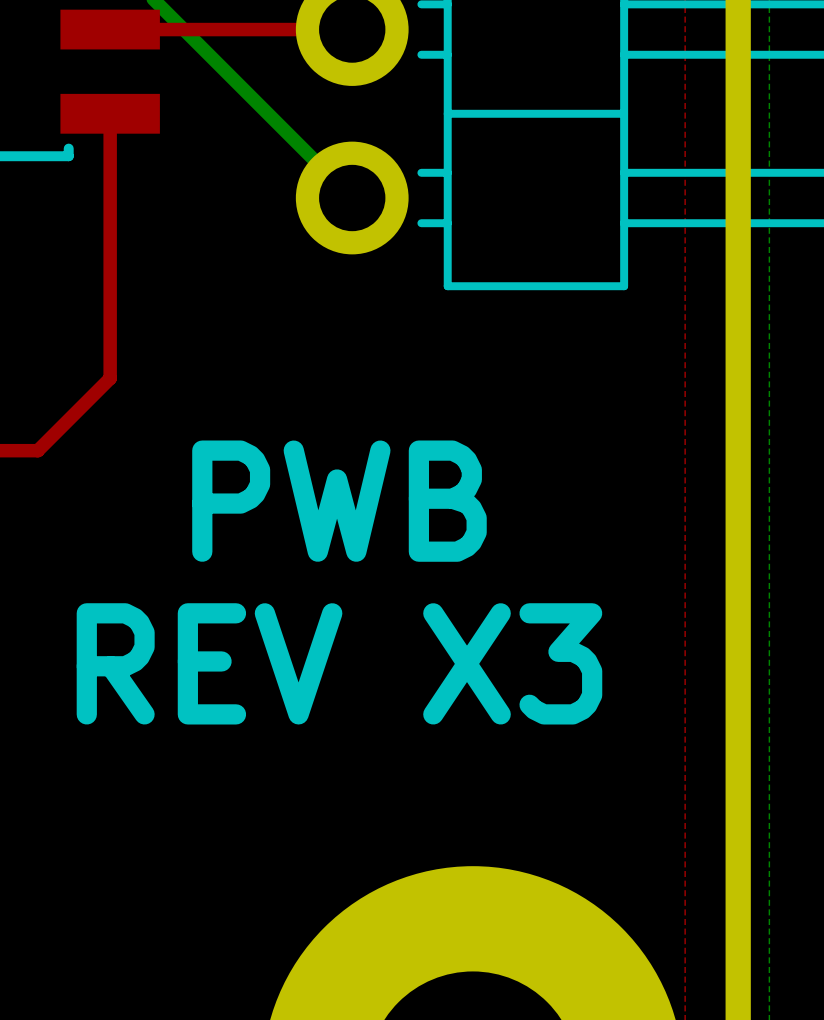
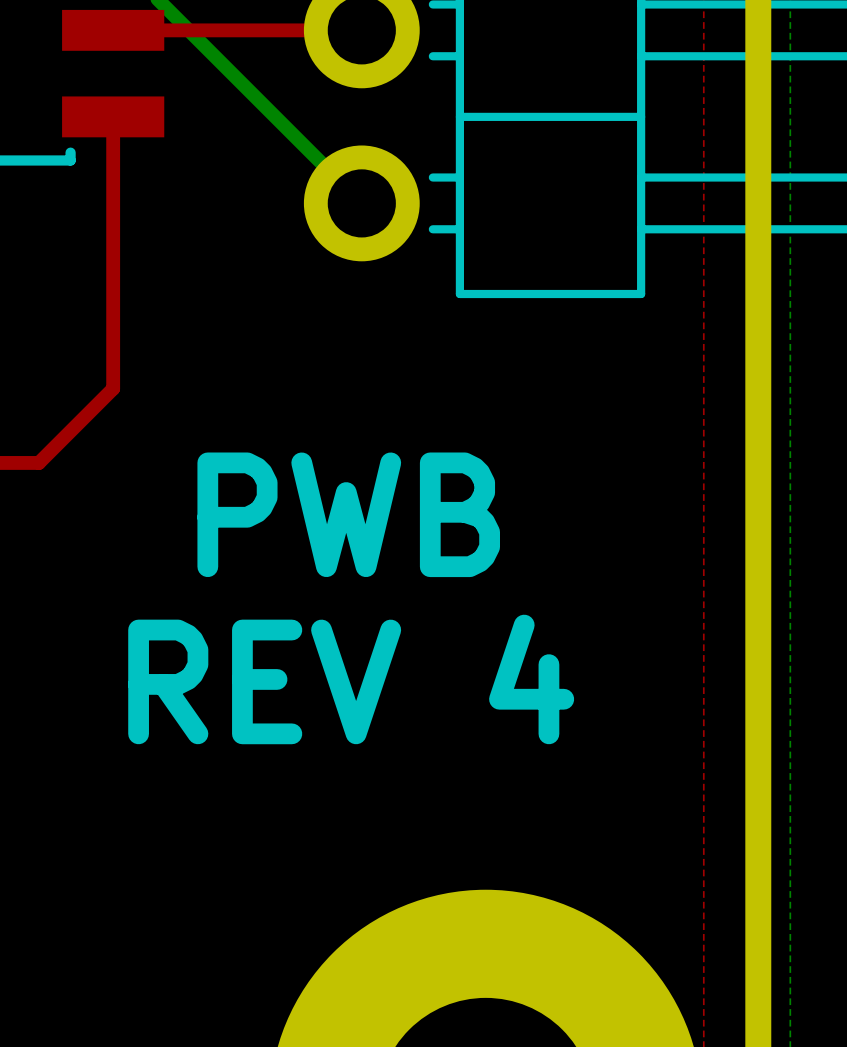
text: REV X3 (339, 663) -> REV 4 (351, 679)

